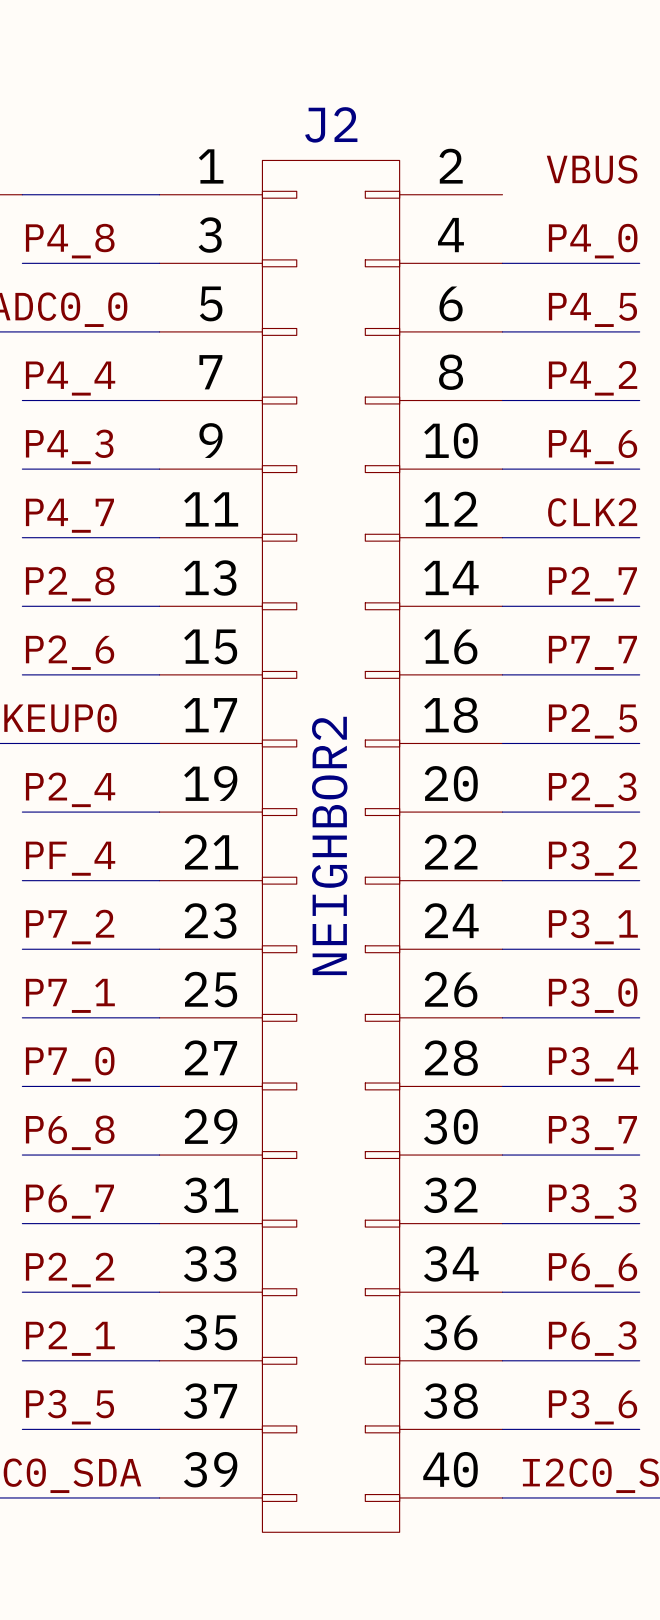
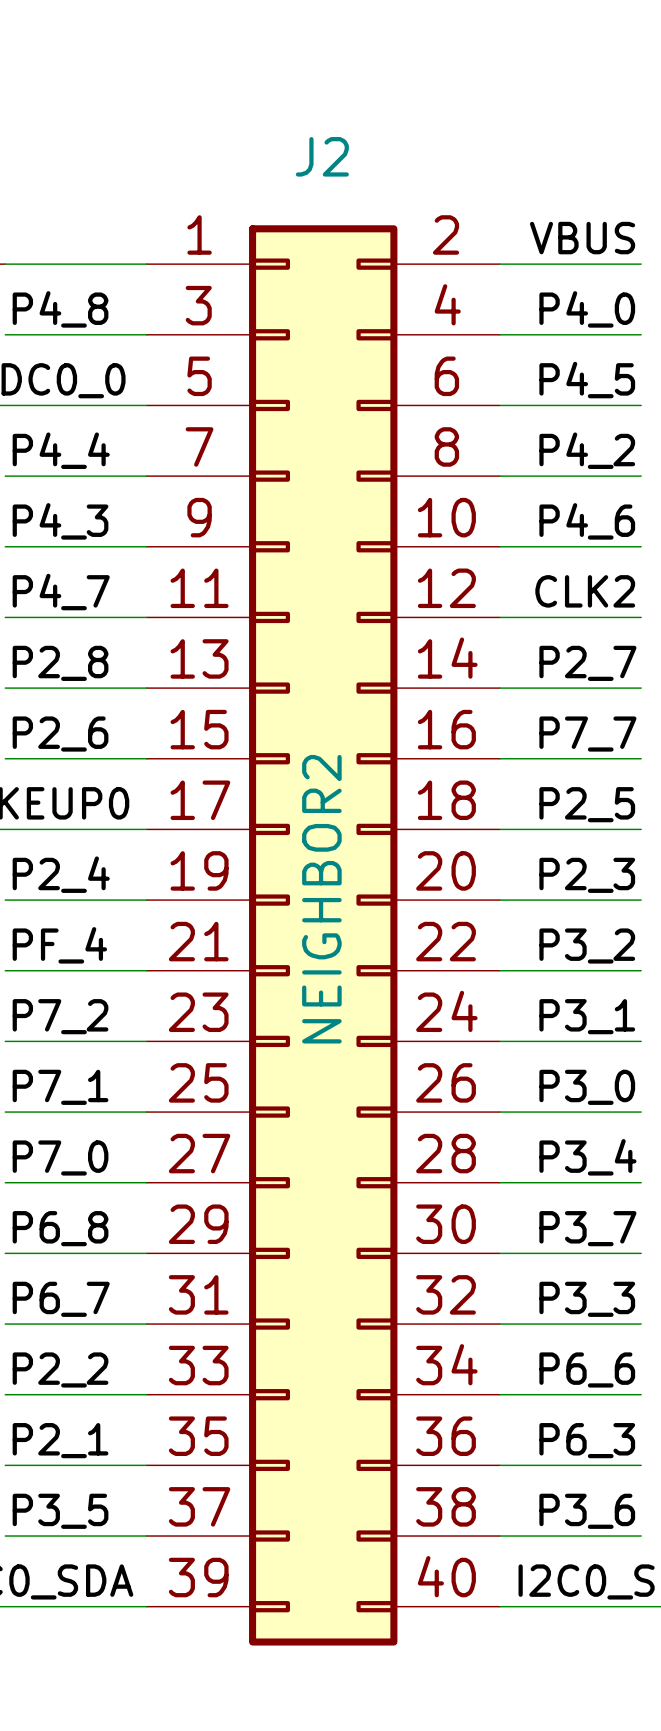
J2 symbol: [159, 160, 503, 1533] -> [146, 225, 500, 1646]
wire: none -> (499, 264) (641, 264)

